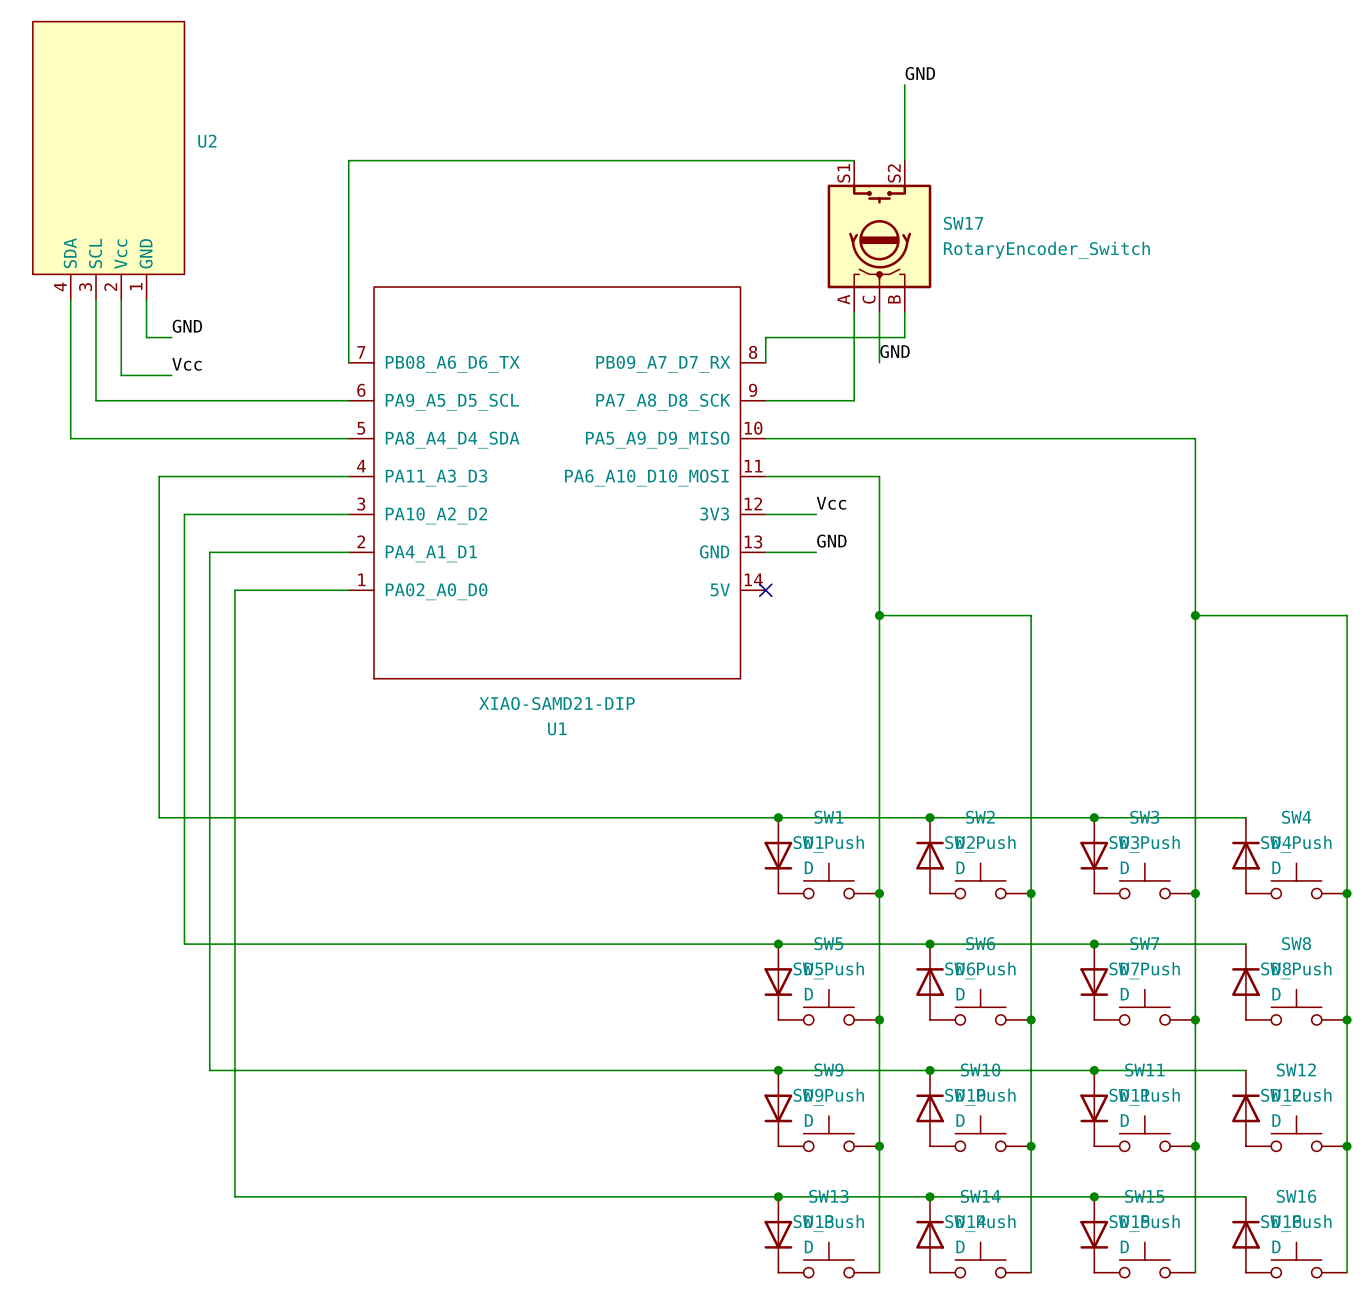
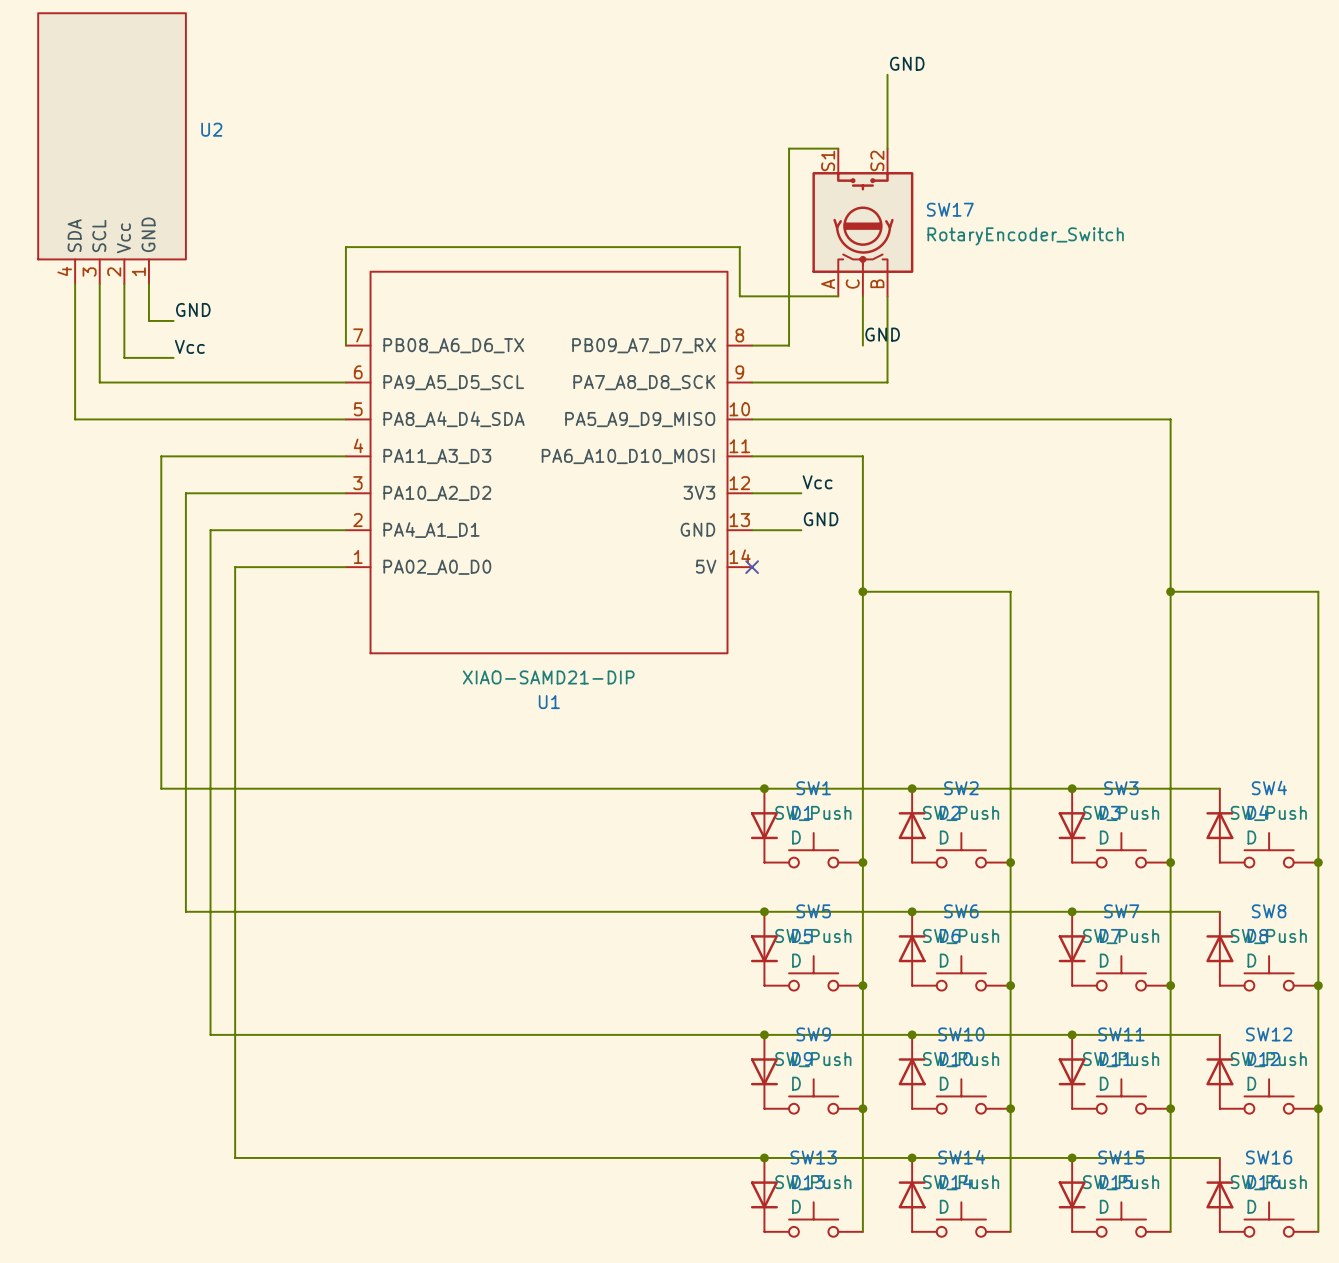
wire: (803, 160) (348, 160) (348, 261) -> (838, 296) (739, 296) (739, 247) (345, 247)
wire: (854, 312) (854, 400) -> (887, 320) (887, 382) (838, 382)
wire: (904, 337) (765, 337) (765, 362) -> (789, 148) (789, 345) (752, 345)

